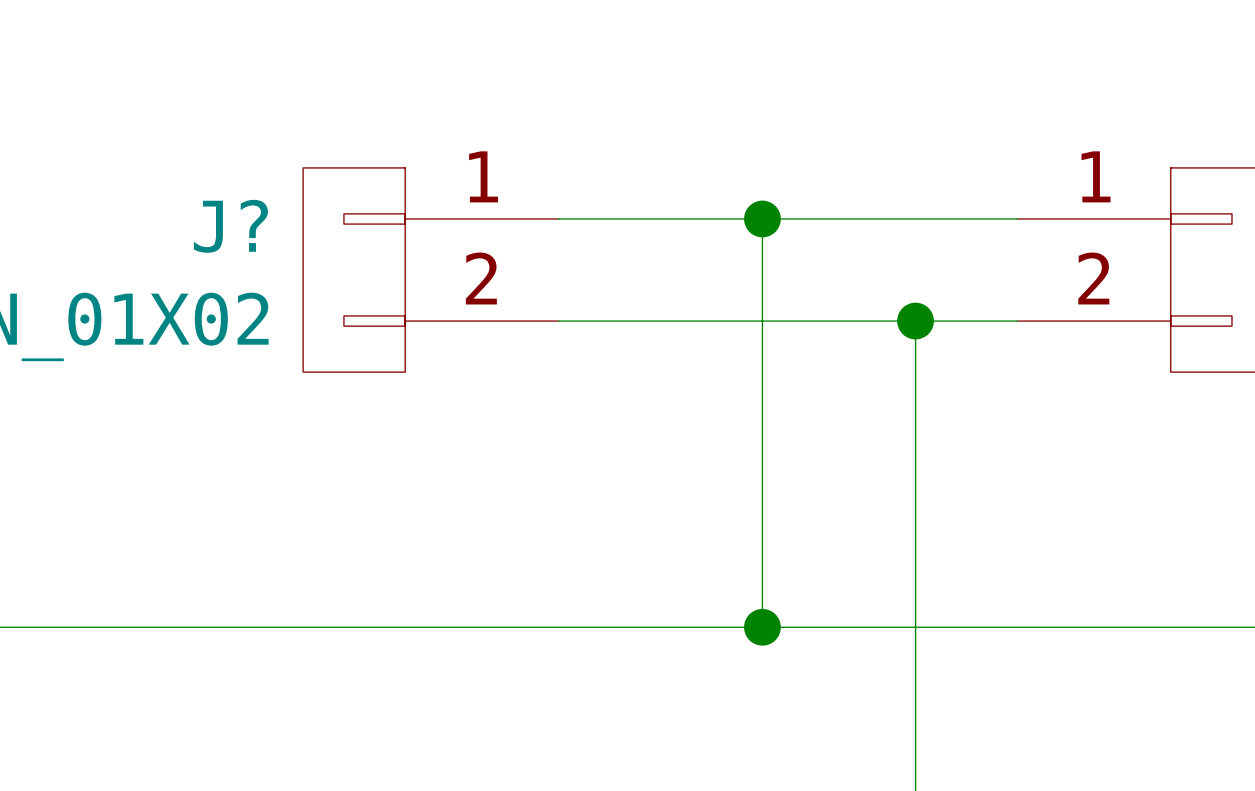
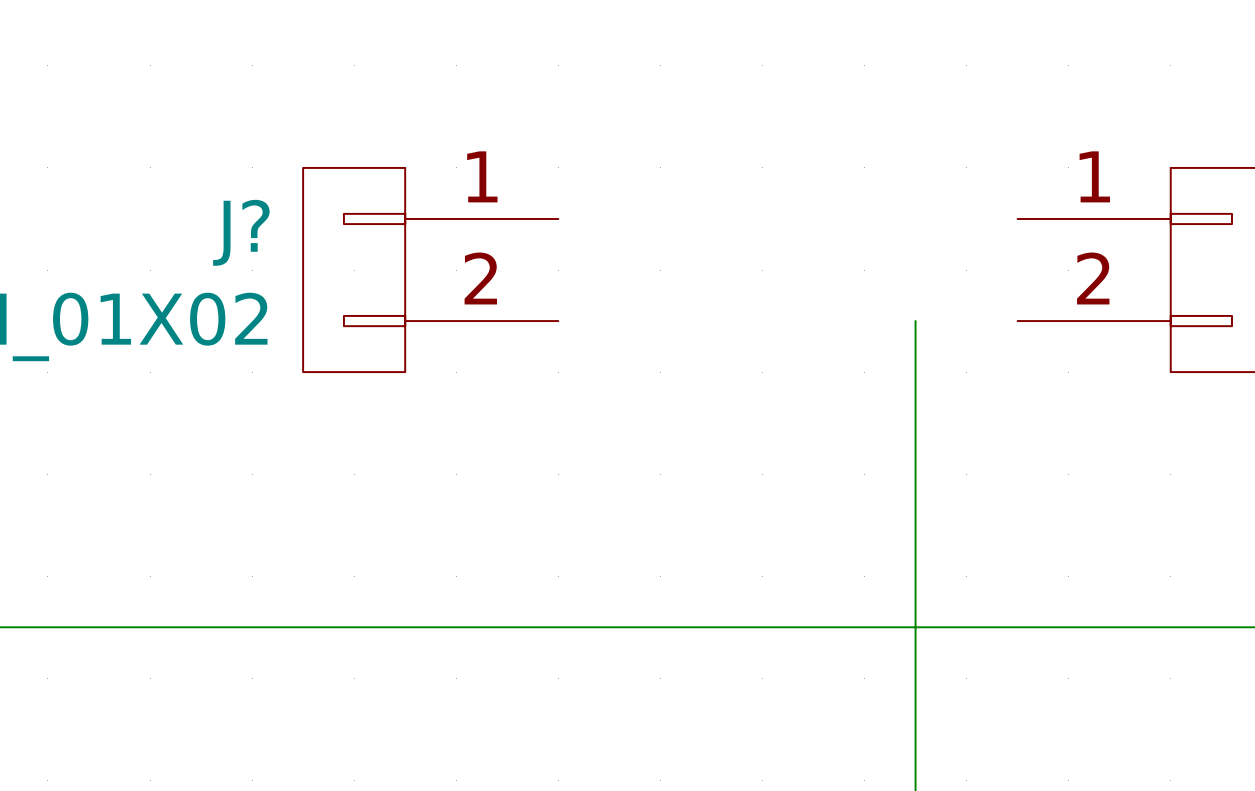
wire: (558, 218) (1017, 218) -> none
wire: (762, 218) (762, 627) -> none
junction: (762, 218) -> none
wire: (558, 321) (1017, 321) -> none
junction: (915, 321) -> none
junction: (762, 627) -> none

